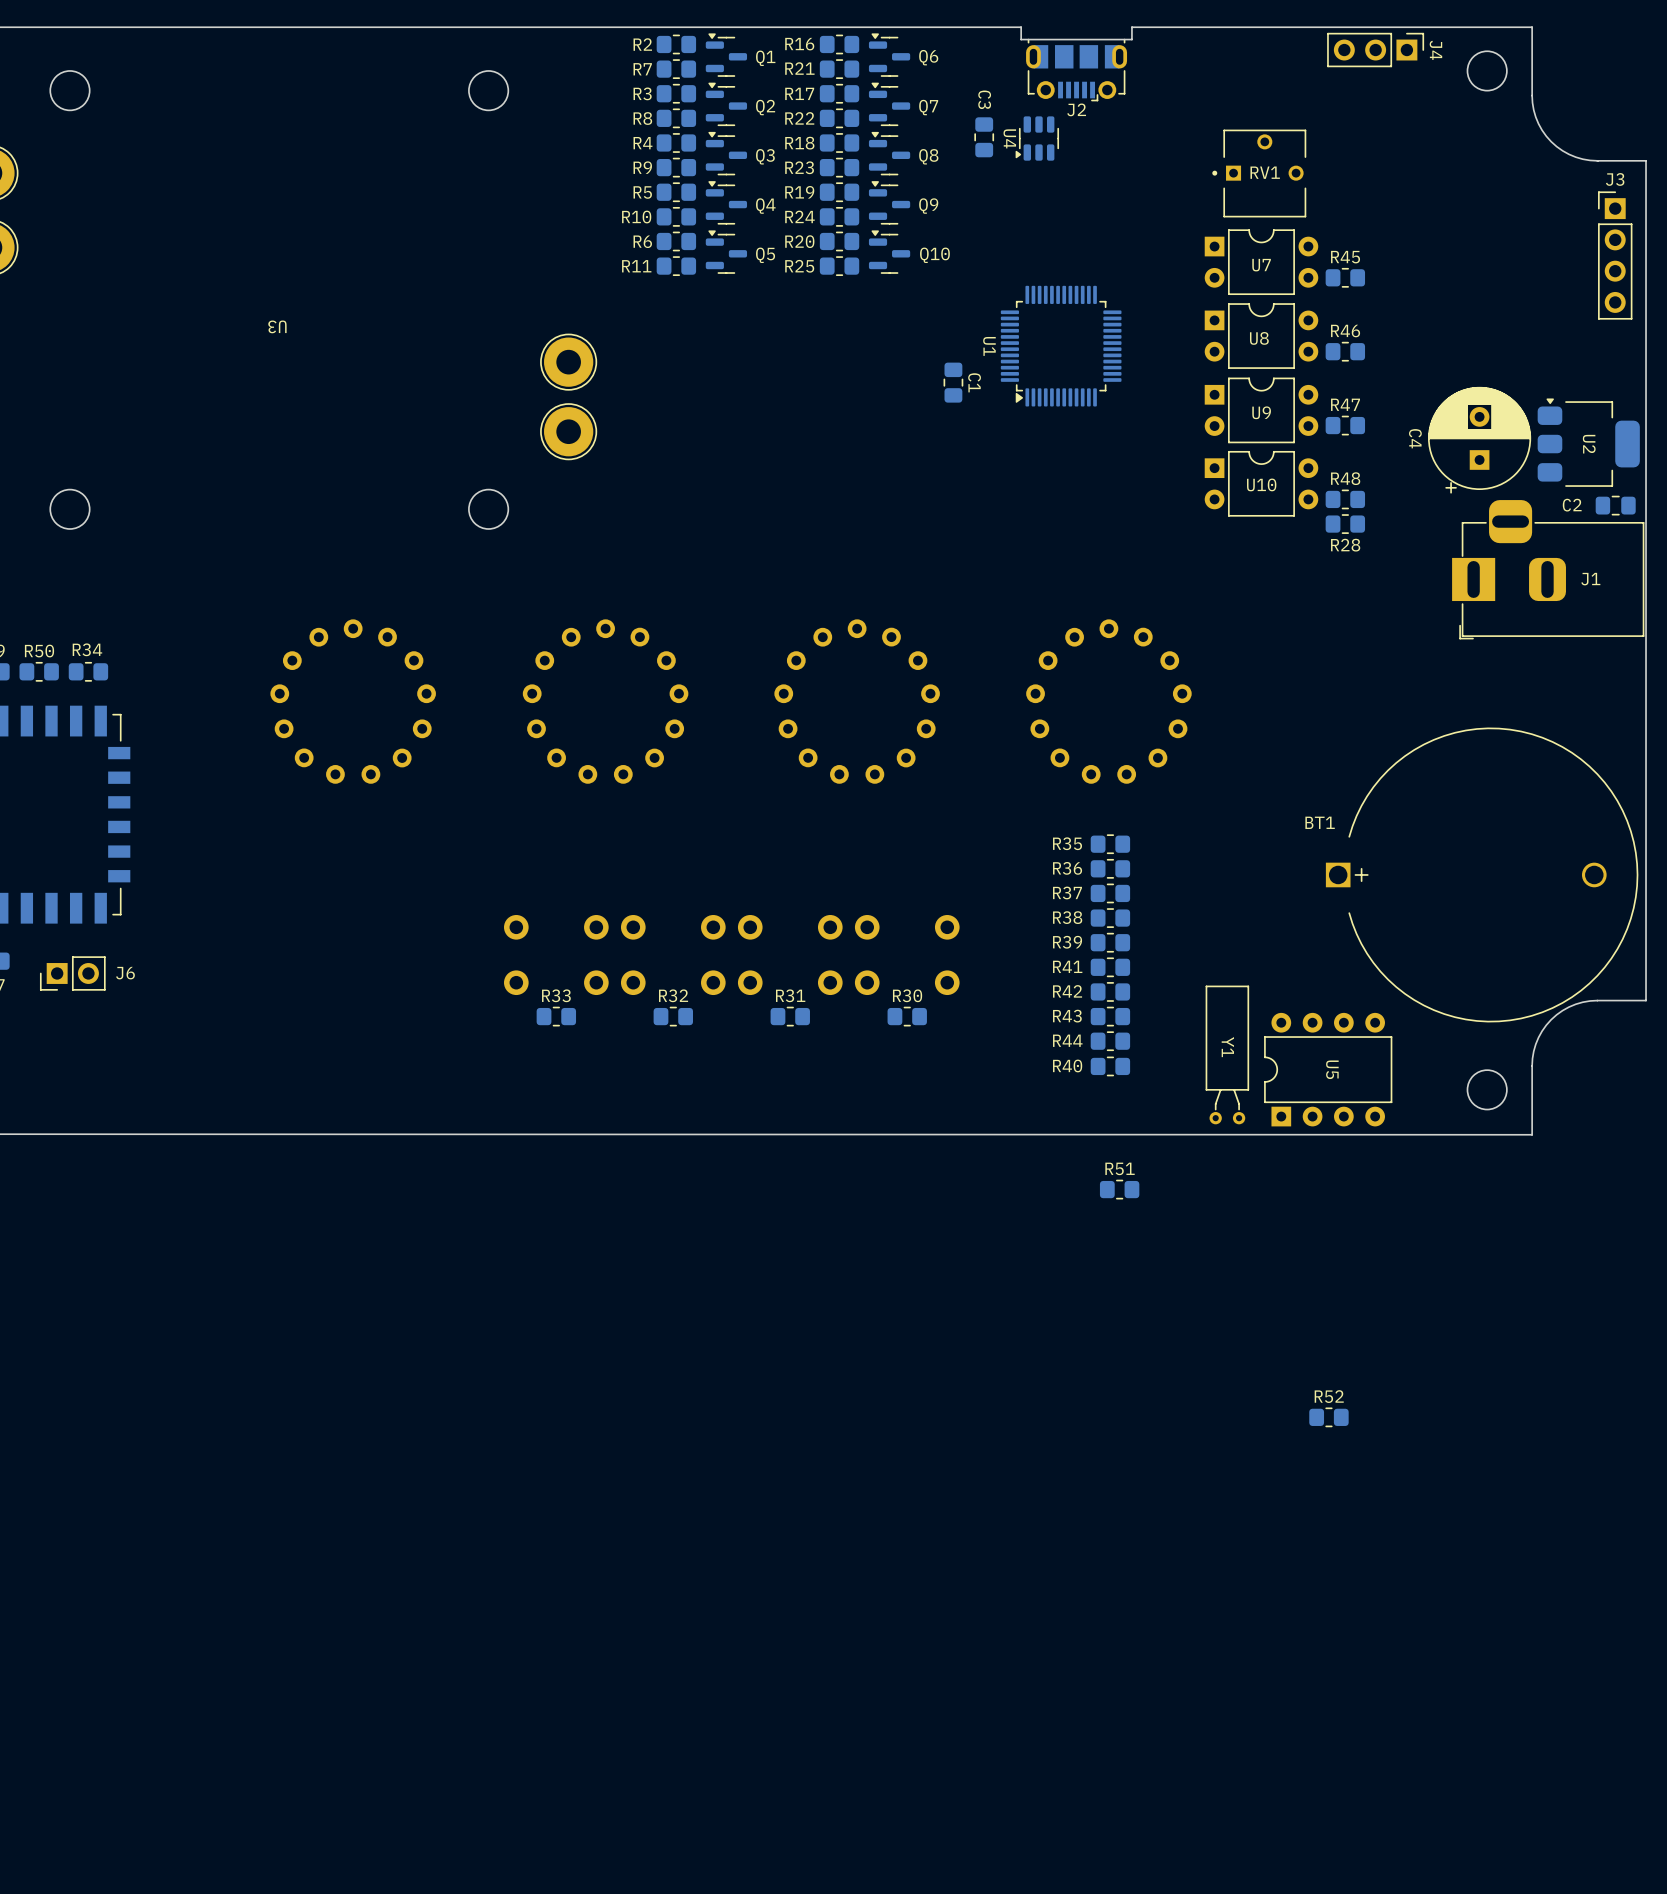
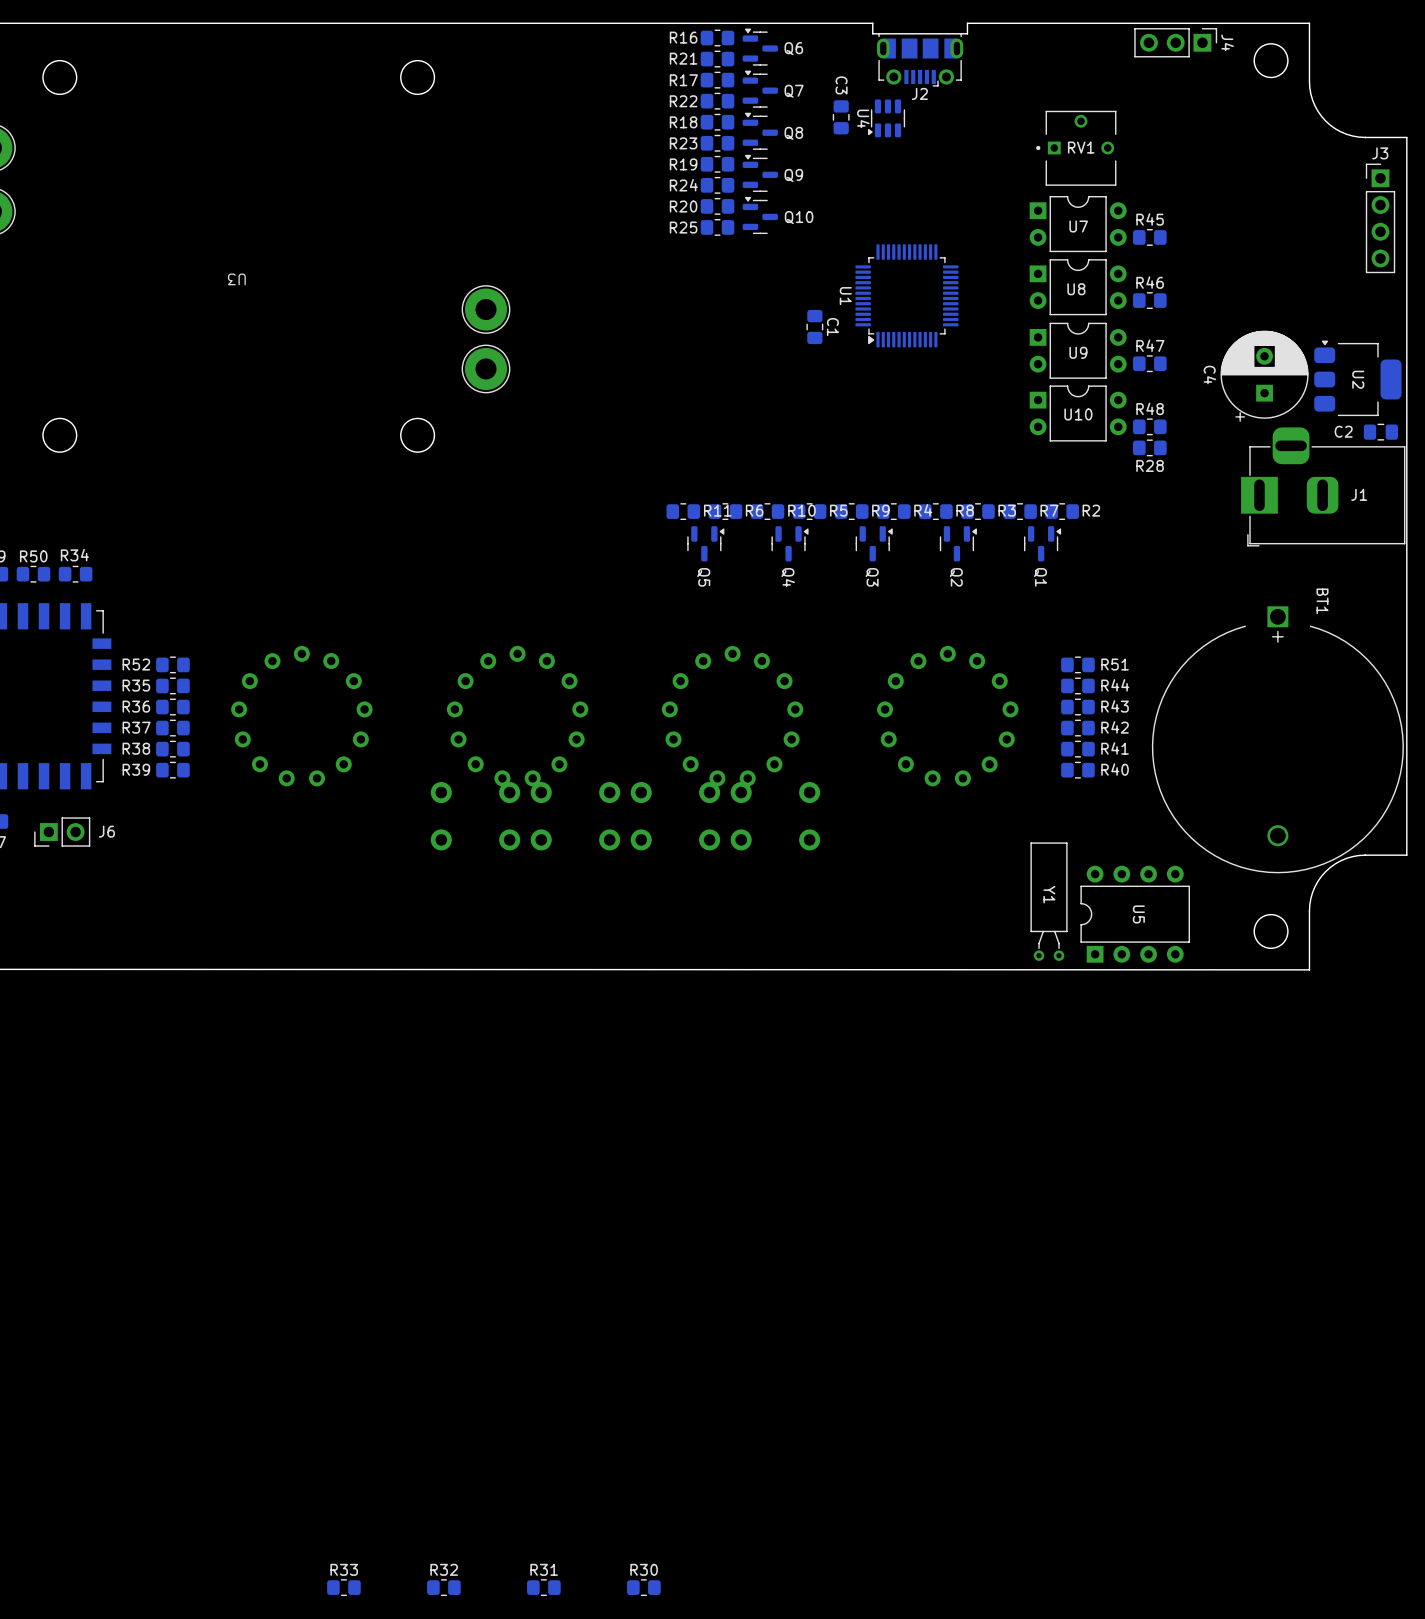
R2 name position: R2 (642, 44) -> R2 (1091, 510)
R2 position: (676, 44) -> (1062, 511)
Q1 rotation: 0° (726, 55) -> 90° clockwise (1042, 543)
Q1 position: (726, 55) -> (1042, 543)
R7 name position: R7 (642, 69) -> R7 (1049, 510)
R7 position: (676, 69) -> (1020, 511)
R3 name position: R3 (642, 93) -> R3 (1007, 510)
R3 position: (676, 93) -> (977, 511)
Q2 rotation: 0° (726, 104) -> 90° clockwise (958, 543)
Q2 position: (726, 104) -> (958, 543)
R8 name position: R8 (642, 118) -> R8 (965, 510)
R8 position: (676, 118) -> (935, 511)
R4 position: (676, 142) -> (893, 511)
R4 name position: R4 (642, 143) -> R4 (923, 510)
Q3 rotation: 0° (726, 153) -> 90° clockwise (874, 543)
Q3 position: (726, 153) -> (874, 543)
R9 name position: R9 (642, 167) -> R9 (880, 510)
R9 position: (676, 167) -> (851, 511)
R5 name position: R5 (642, 192) -> R5 (838, 510)
R5 position: (676, 192) -> (809, 511)
Q4 rotation: 0° (726, 202) -> 90° clockwise (790, 543)
Q4 position: (726, 202) -> (790, 543)
R10 position: (676, 216) -> (767, 511)
R10 name position: R10 (636, 217) -> R10 (801, 510)
R6 name position: R6 (642, 241) -> R6 (754, 510)
R6 position: (676, 241) -> (725, 511)
Q5 rotation: 0° (726, 252) -> 90° clockwise (705, 543)
Q5 position: (726, 252) -> (705, 543)
R11 name position: R11 (636, 266) -> R11 (717, 510)
R11 position: (676, 266) -> (683, 511)
part position: (353, 701) -> (301, 716)
part position: (605, 701) -> (517, 716)
part position: (857, 701) -> (732, 716)
part position: (1108, 701) -> (947, 716)
R35 position: (1110, 844) -> (172, 685)
R36 position: (1110, 868) -> (172, 707)
BT1 rotation: 0° (1482, 874) -> 90° clockwise (1277, 739)
R37 position: (1110, 893) -> (172, 728)
R38 position: (1110, 918) -> (172, 749)
R39 position: (1110, 942) -> (172, 770)
R41 name position: R41 (1067, 966) -> R41 (1115, 748)
R41 position: (1110, 967) -> (1077, 749)
R42 name position: R42 (1067, 991) -> R42 (1115, 727)
R42 position: (1110, 991) -> (1077, 728)
R33 position: (556, 1016) -> (343, 1587)
R32 position: (673, 1016) -> (443, 1587)
R31 position: (790, 1016) -> (543, 1587)
R30 position: (907, 1016) -> (643, 1587)
R43 name position: R43 (1067, 1016) -> R43 (1115, 706)
R43 position: (1110, 1016) -> (1077, 707)
R44 name position: R44 (1067, 1040) -> R44 (1115, 685)
R44 position: (1110, 1041) -> (1077, 685)
R40 name position: R40 (1067, 1065) -> R40 (1115, 769)
R40 position: (1110, 1066) -> (1077, 770)
R51 name position: R51 (1120, 1168) -> R51 (1115, 664)
R51 position: (1119, 1189) -> (1077, 664)
R52 name position: R52 (1329, 1396) -> R52 (136, 664)
R52 position: (1328, 1417) -> (172, 664)

